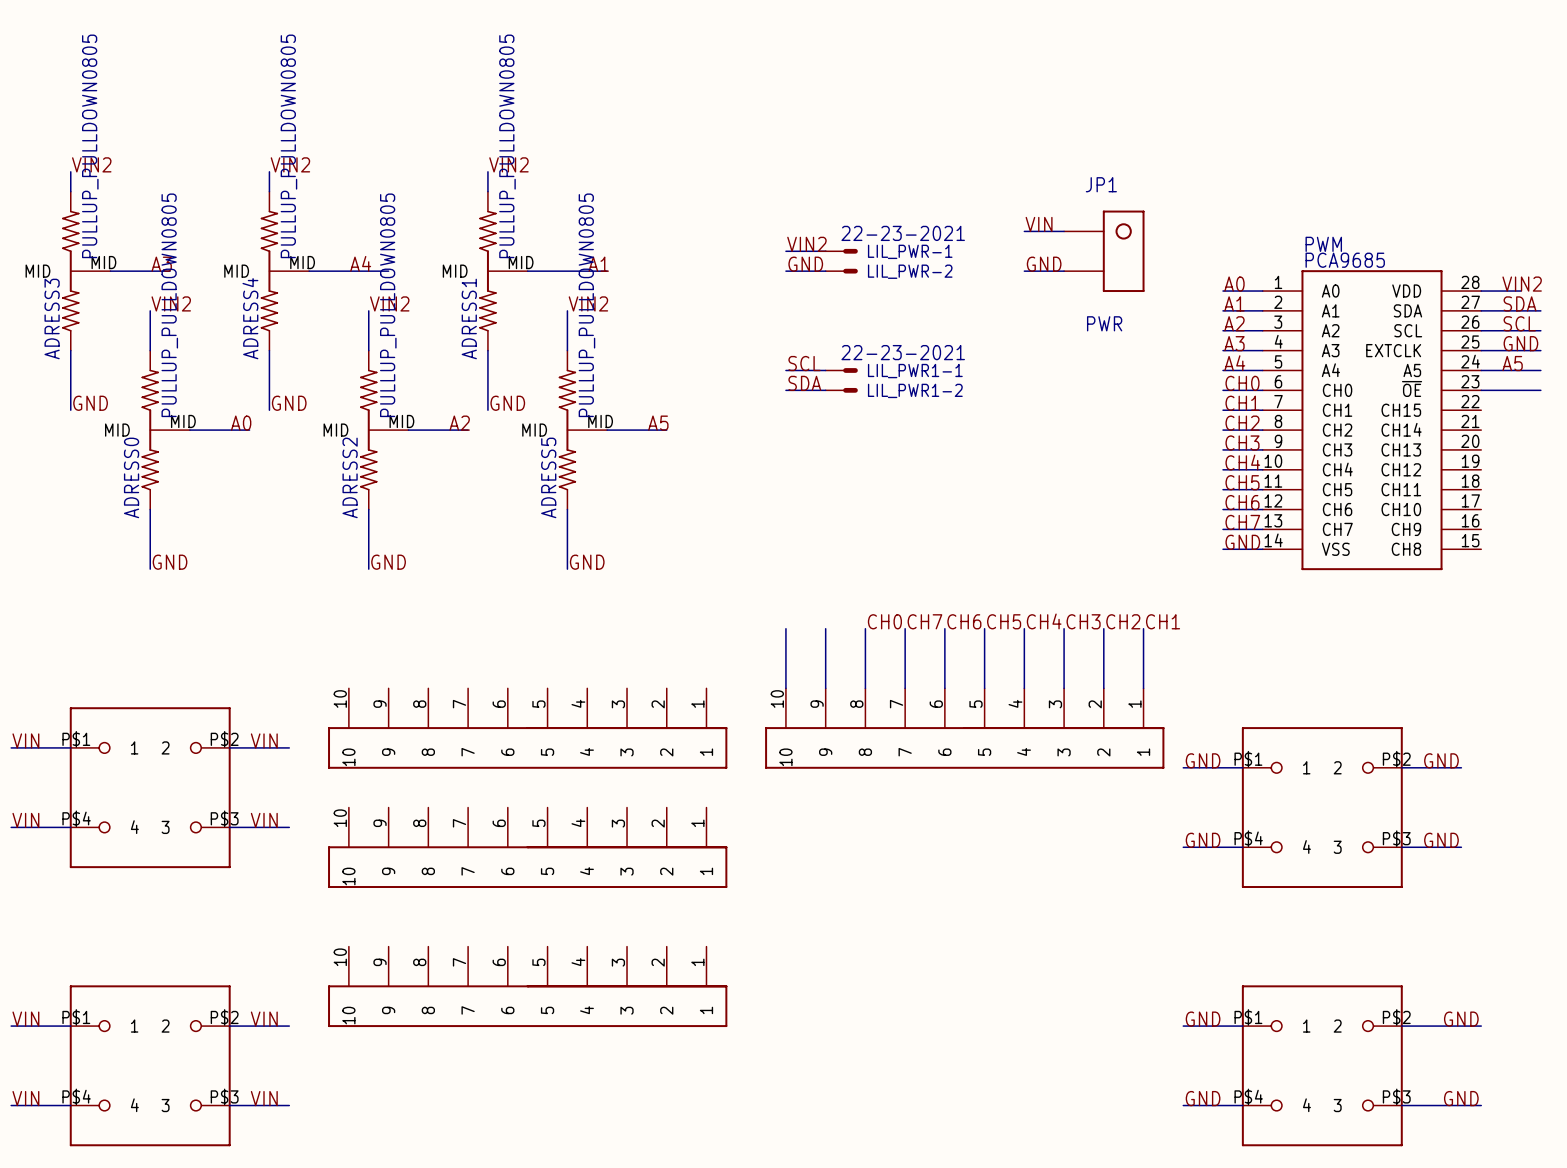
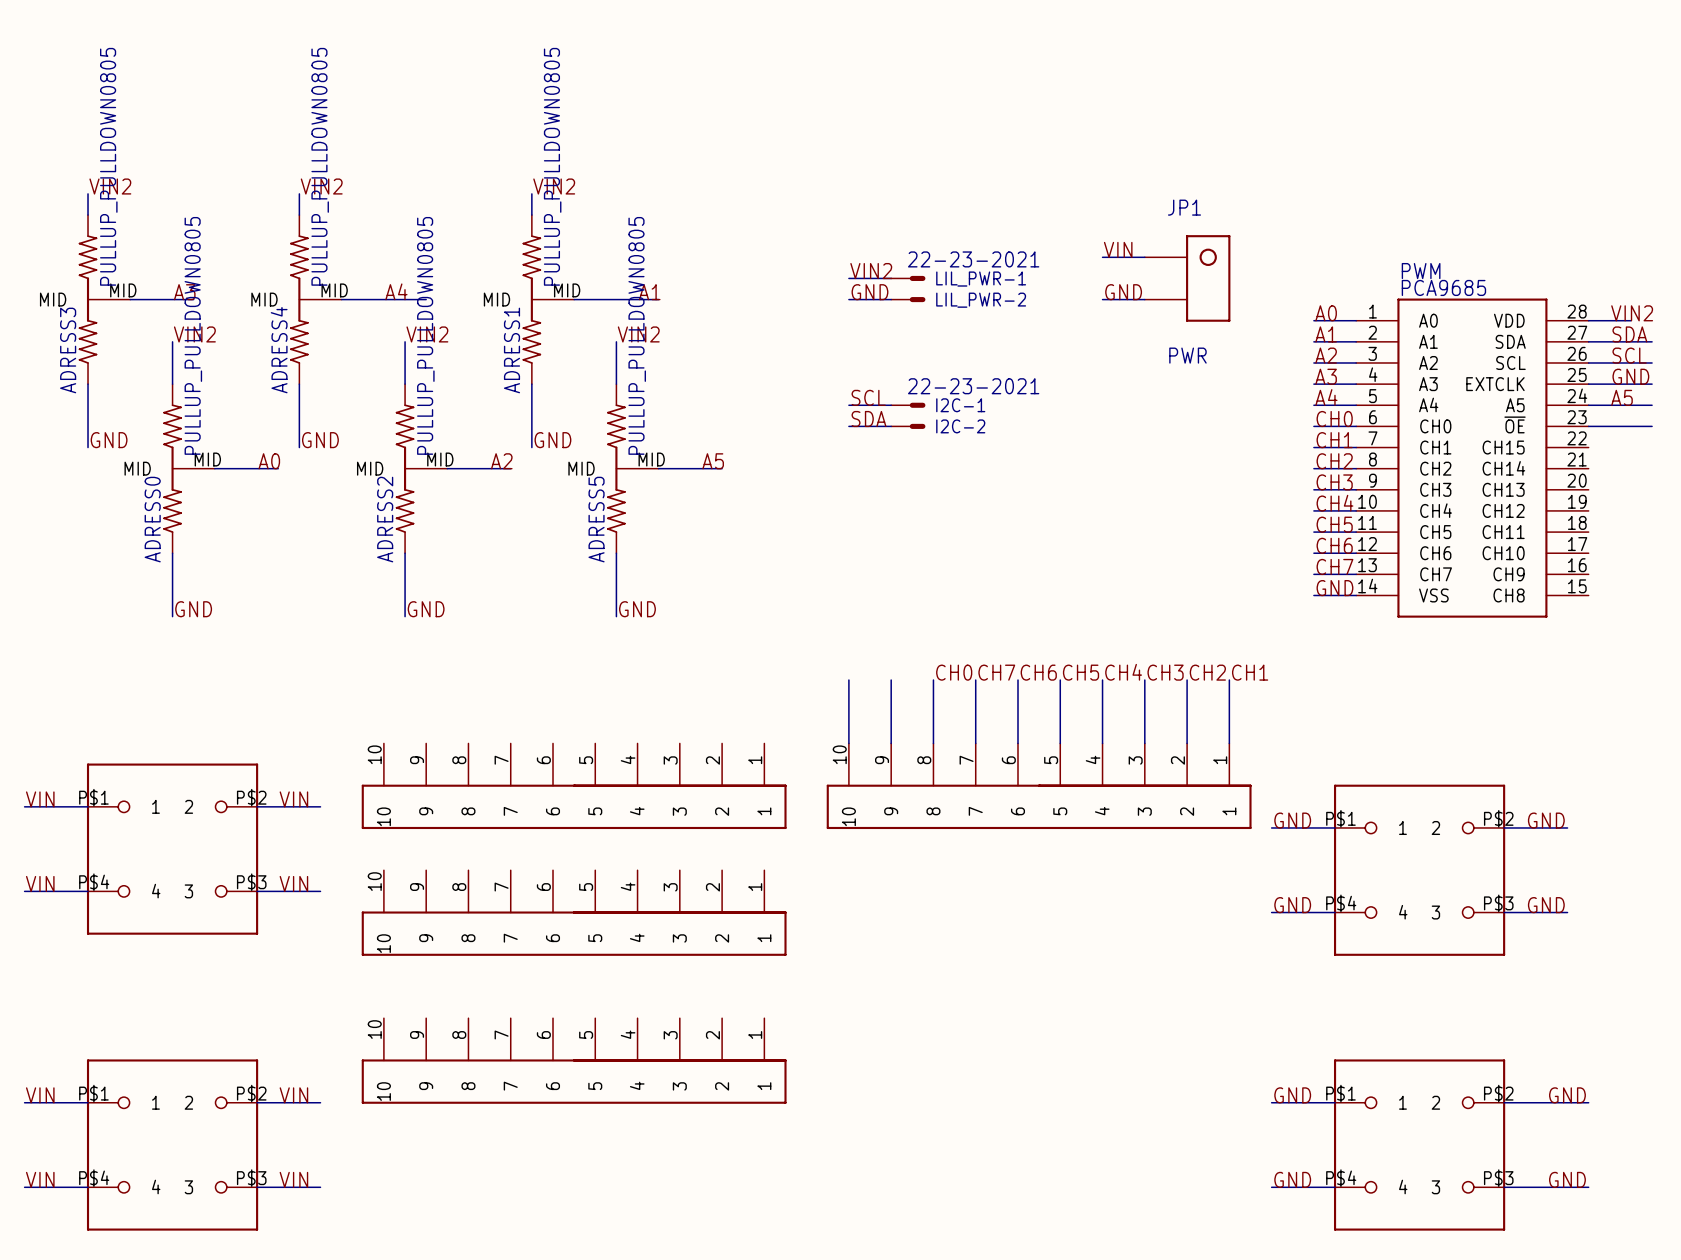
LIL_PWR1-1 name: LIL_PWR1-1 (915, 371) -> I2C-1 (960, 405)
LIL_PWR1-2 name: LIL_PWR1-2 (915, 390) -> I2C-2 (960, 426)

